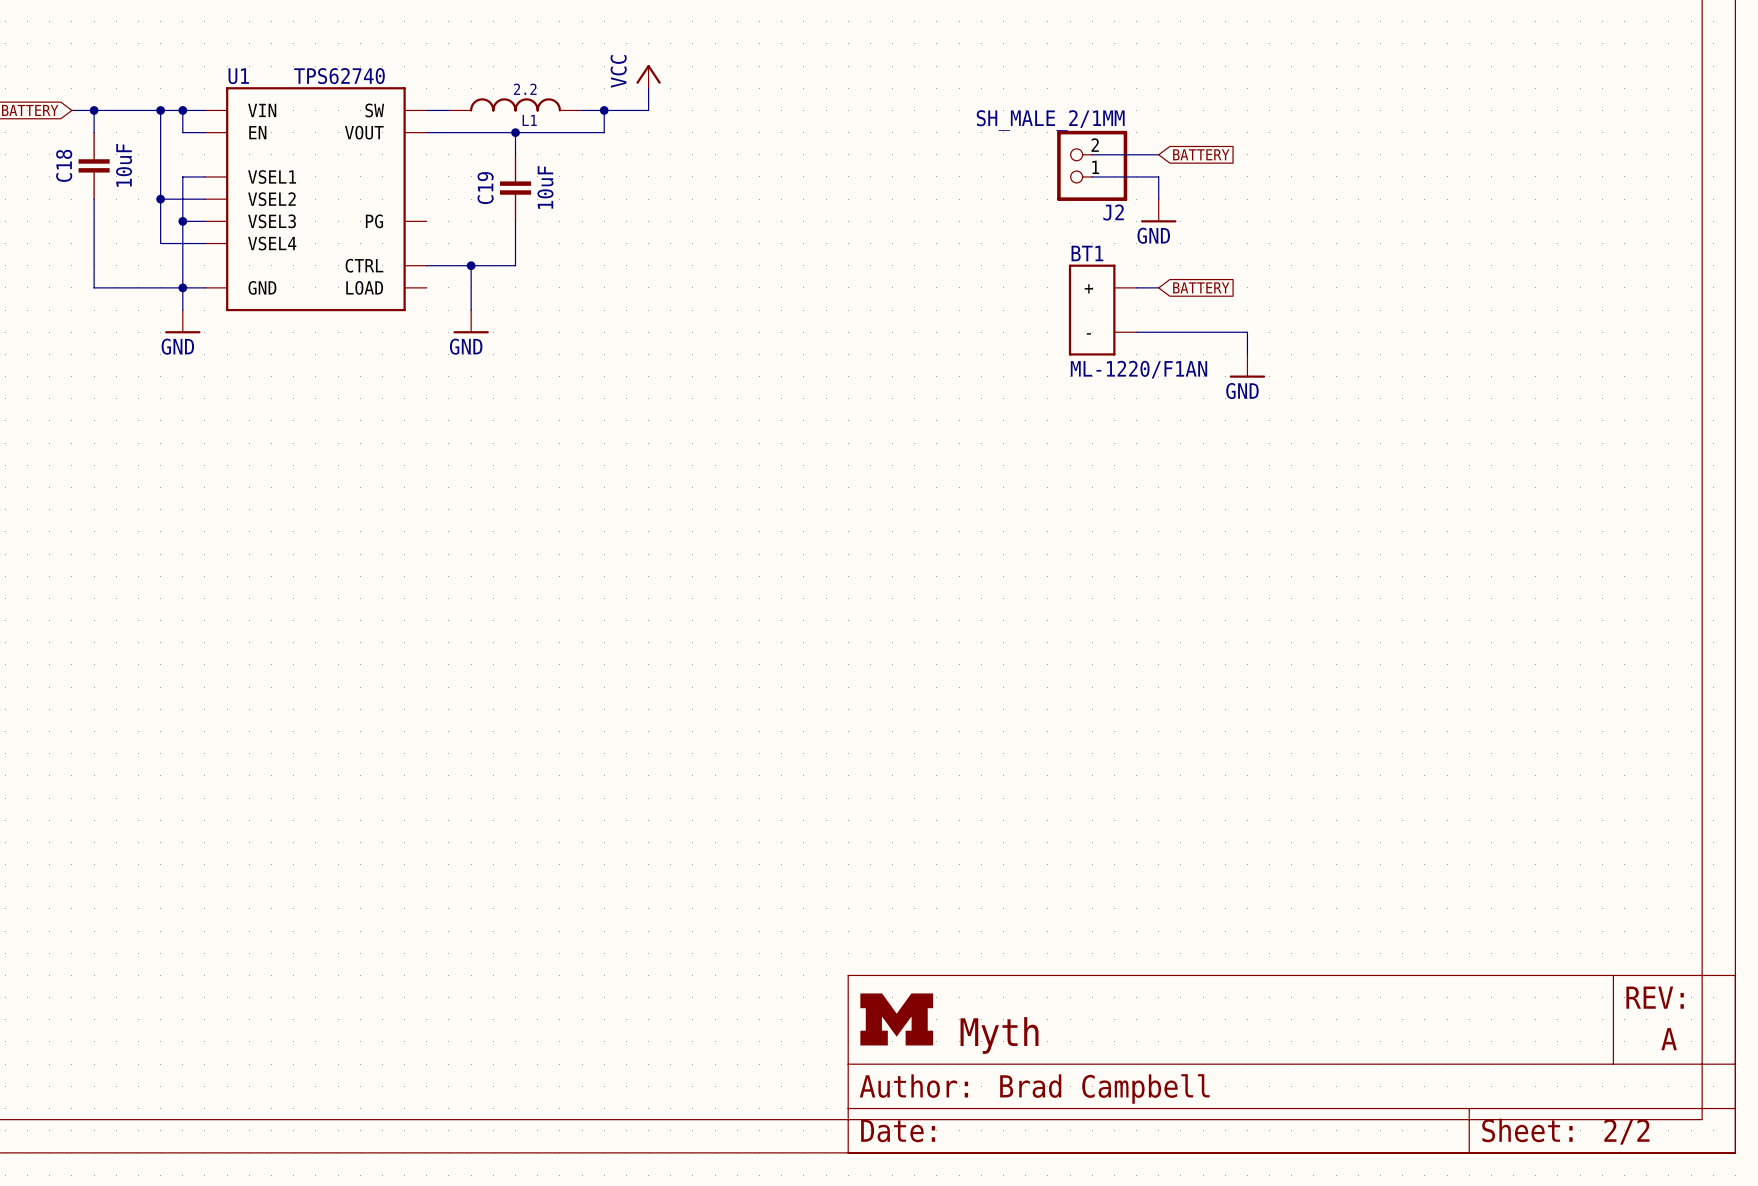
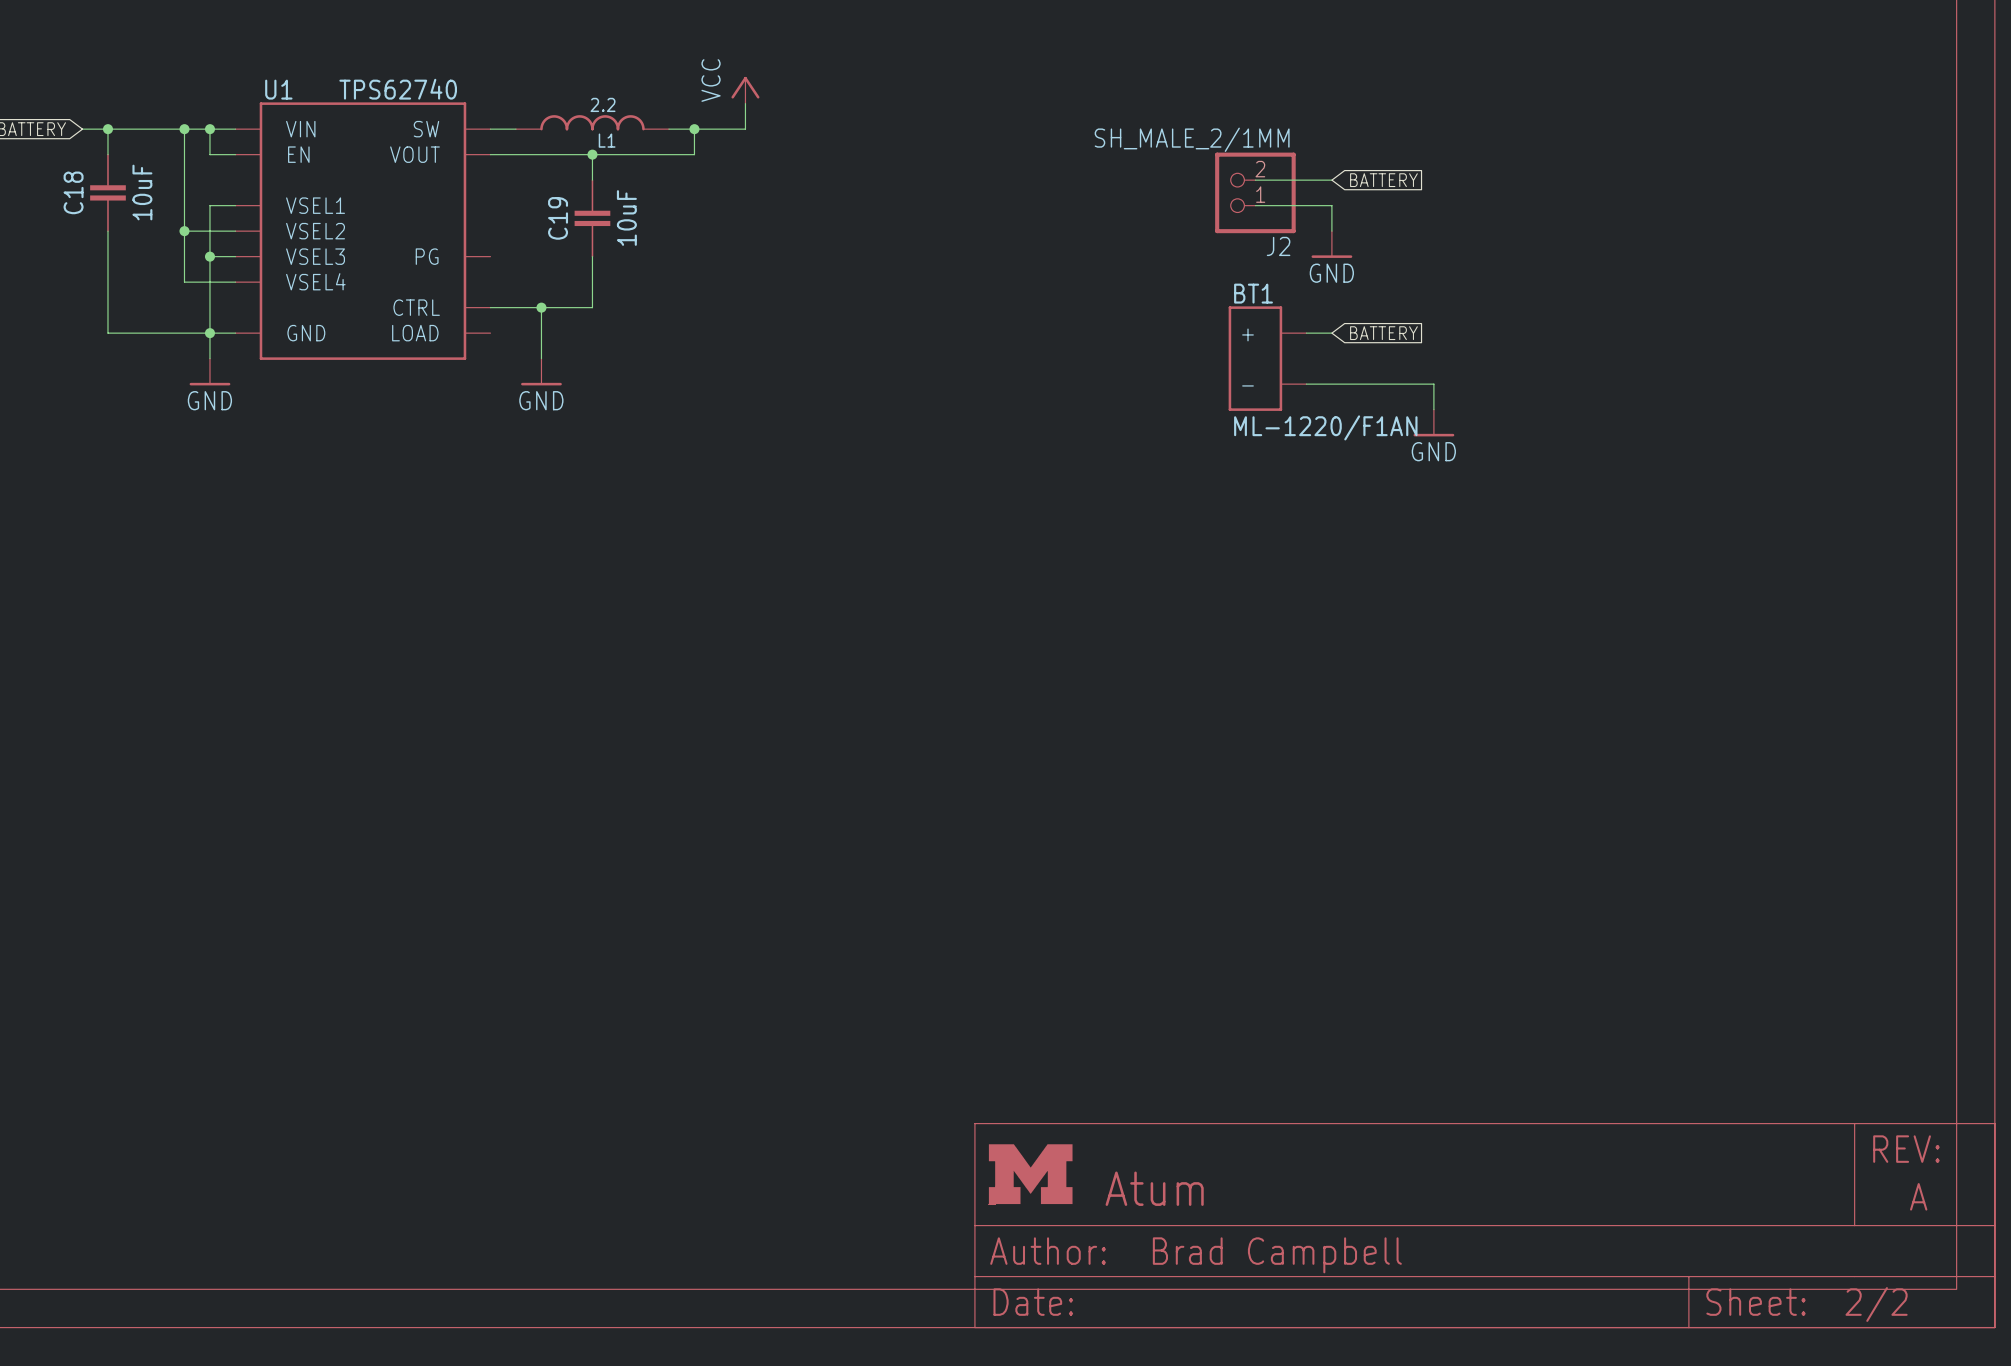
part text: Myth (999, 1035) -> Atum (1154, 1188)

